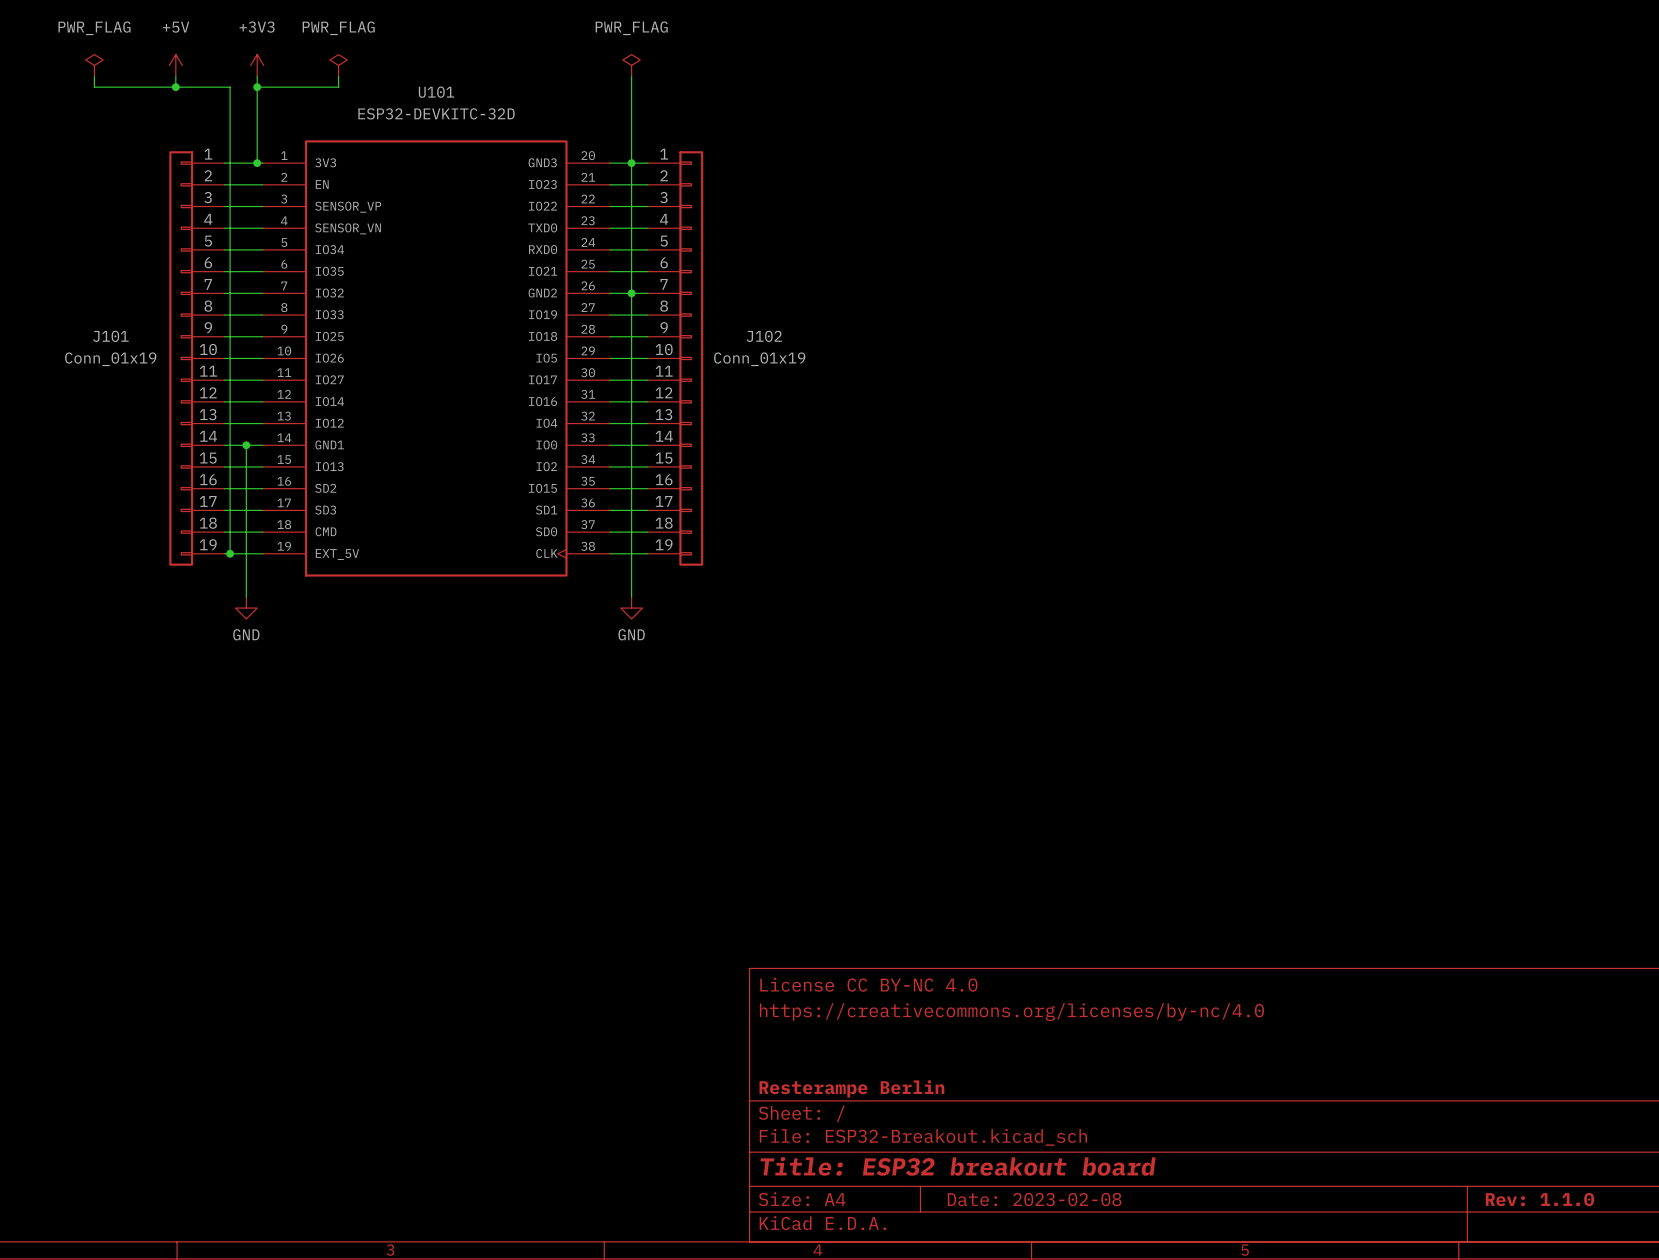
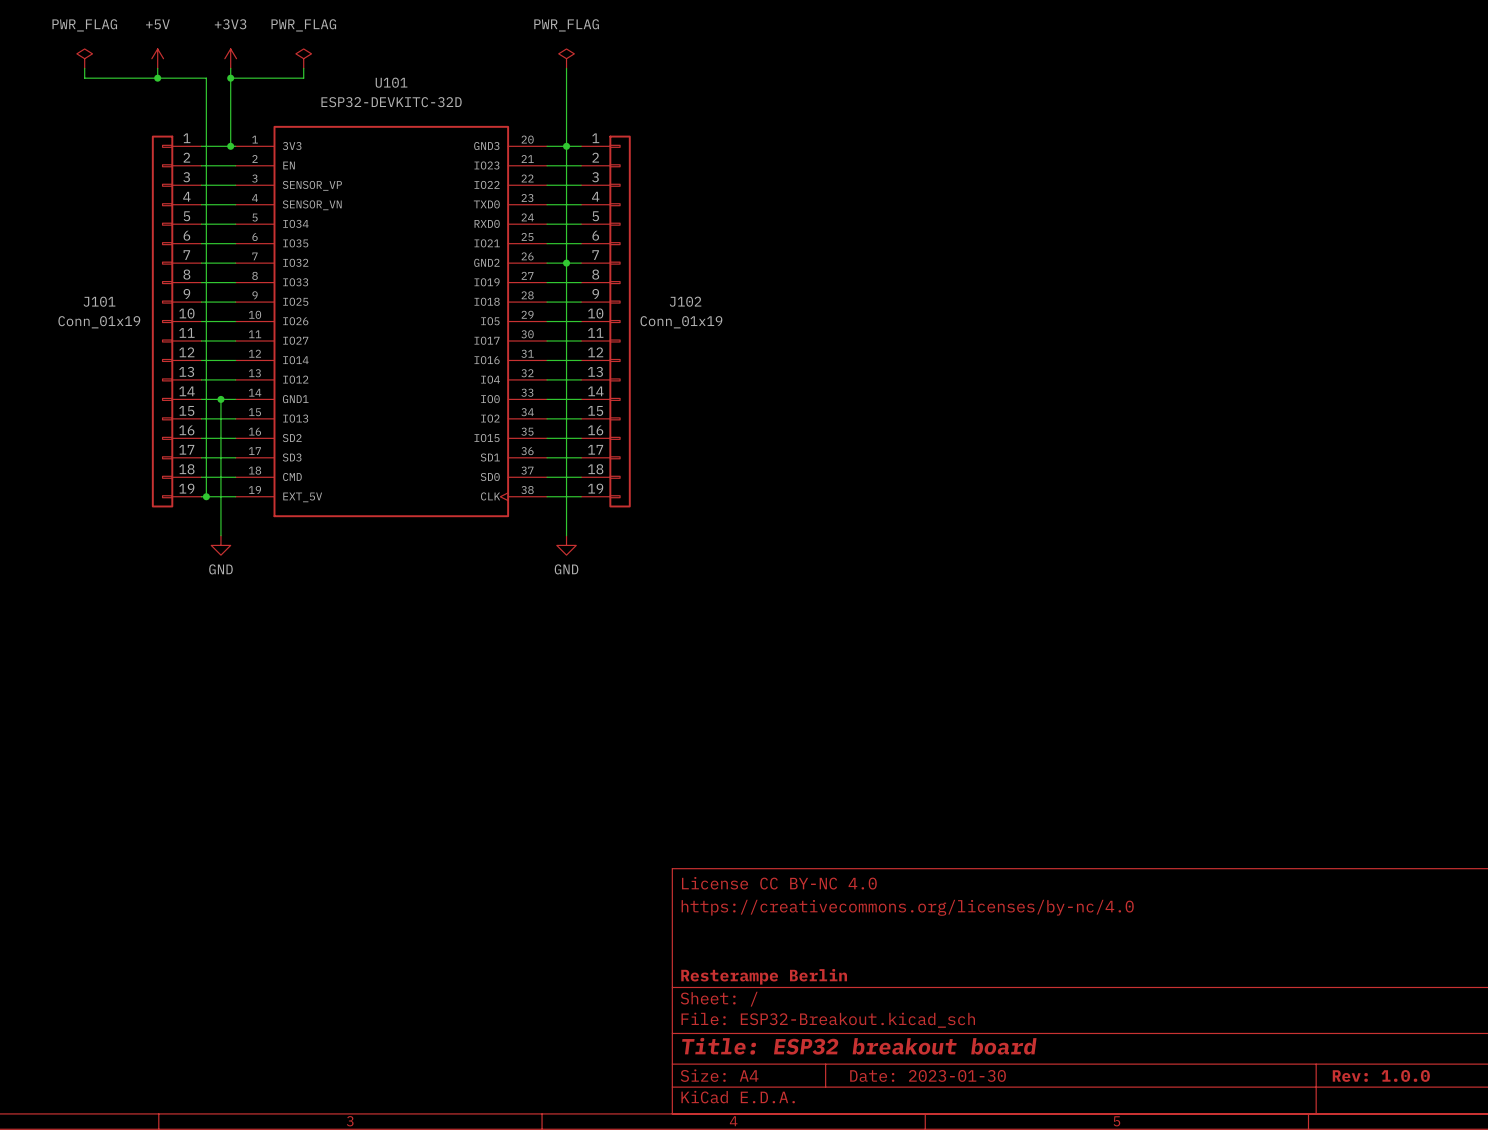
title block: Date: 2023-02-08 (1034, 1199) -> Date: 2023-01-30 (928, 1075)
title block: Rev: 1.1.0 (1539, 1199) -> Rev: 1.0.0 (1381, 1075)

